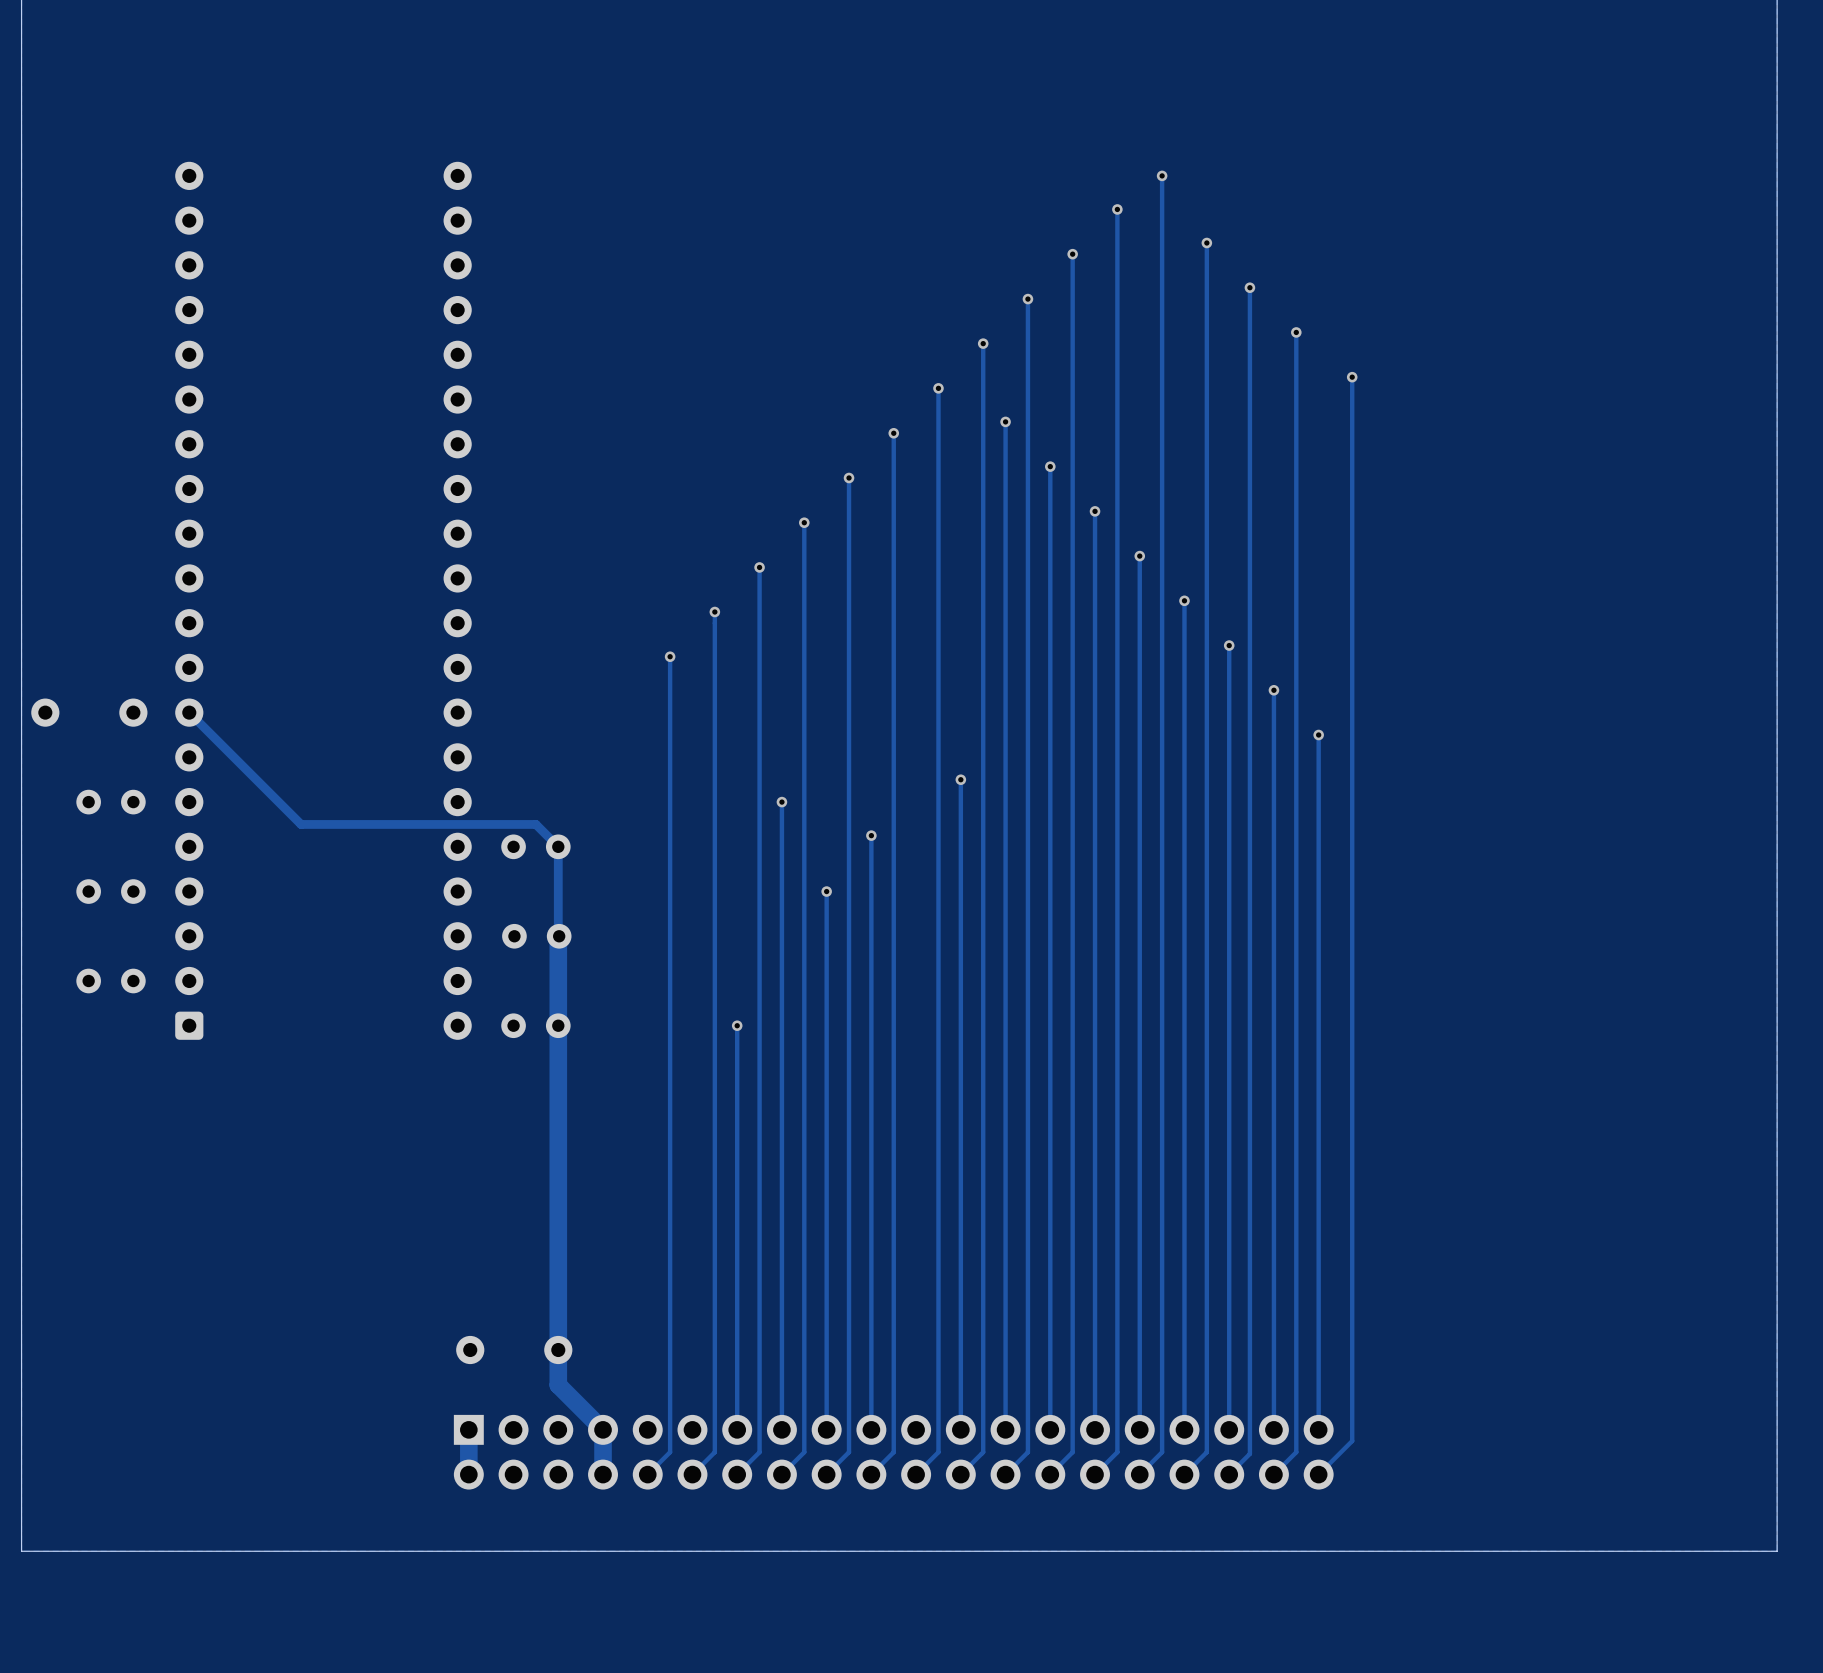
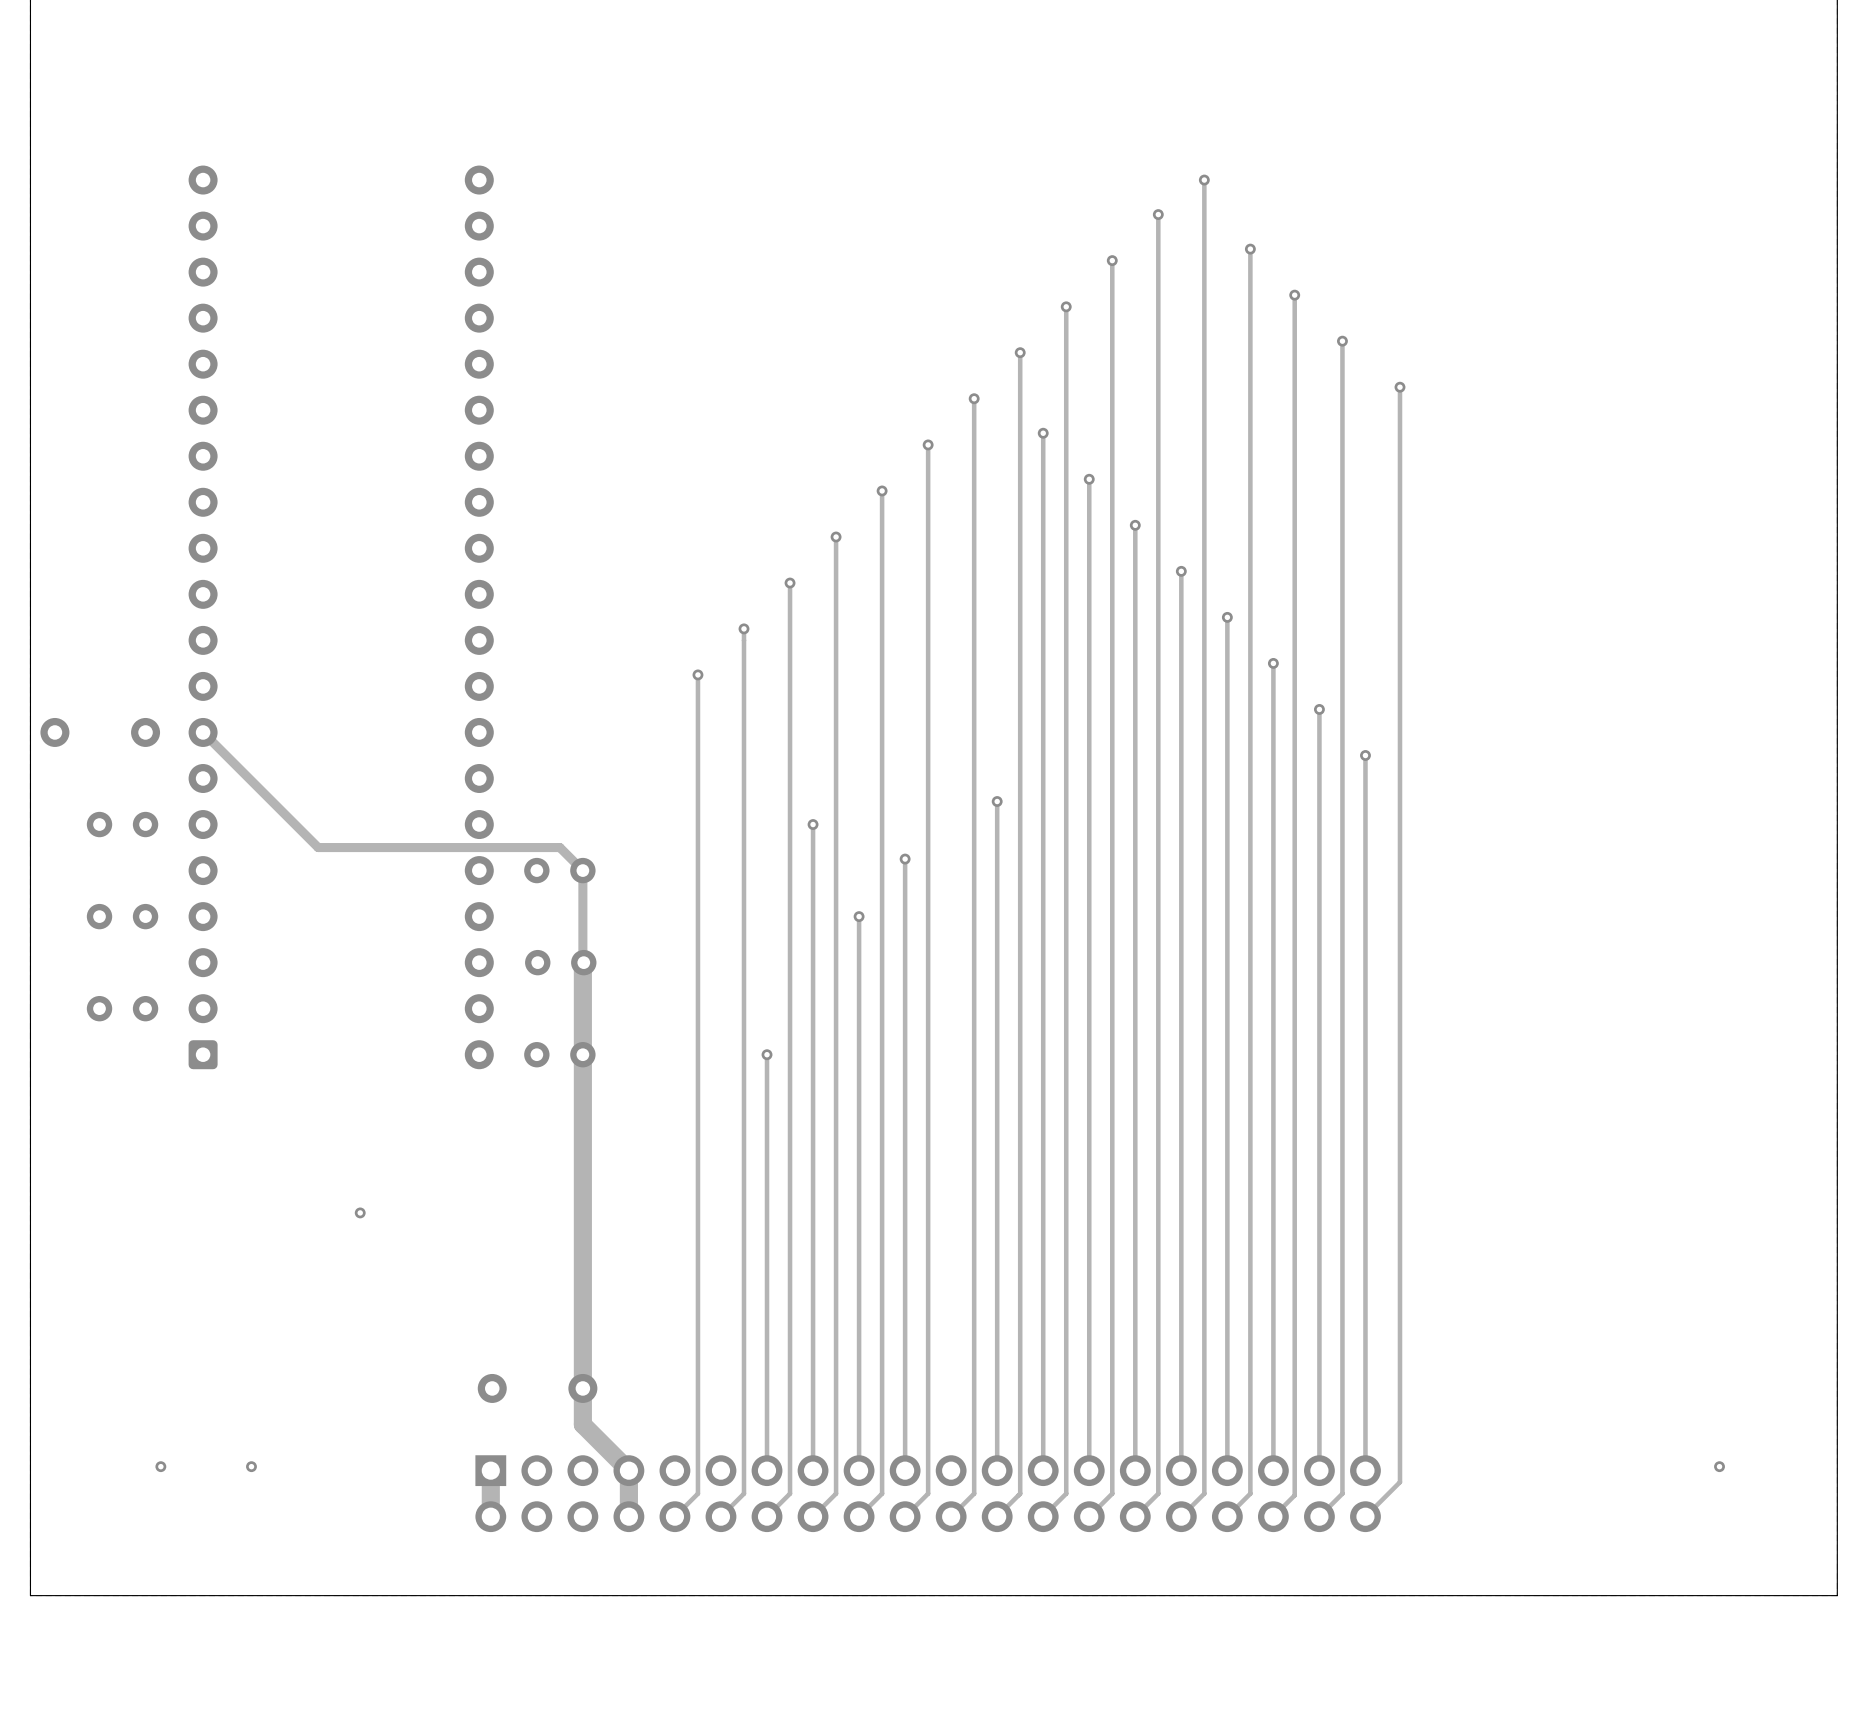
via: none -> (360, 1212)
via: none -> (160, 1466)
via: none -> (251, 1466)
via: none -> (1719, 1466)

